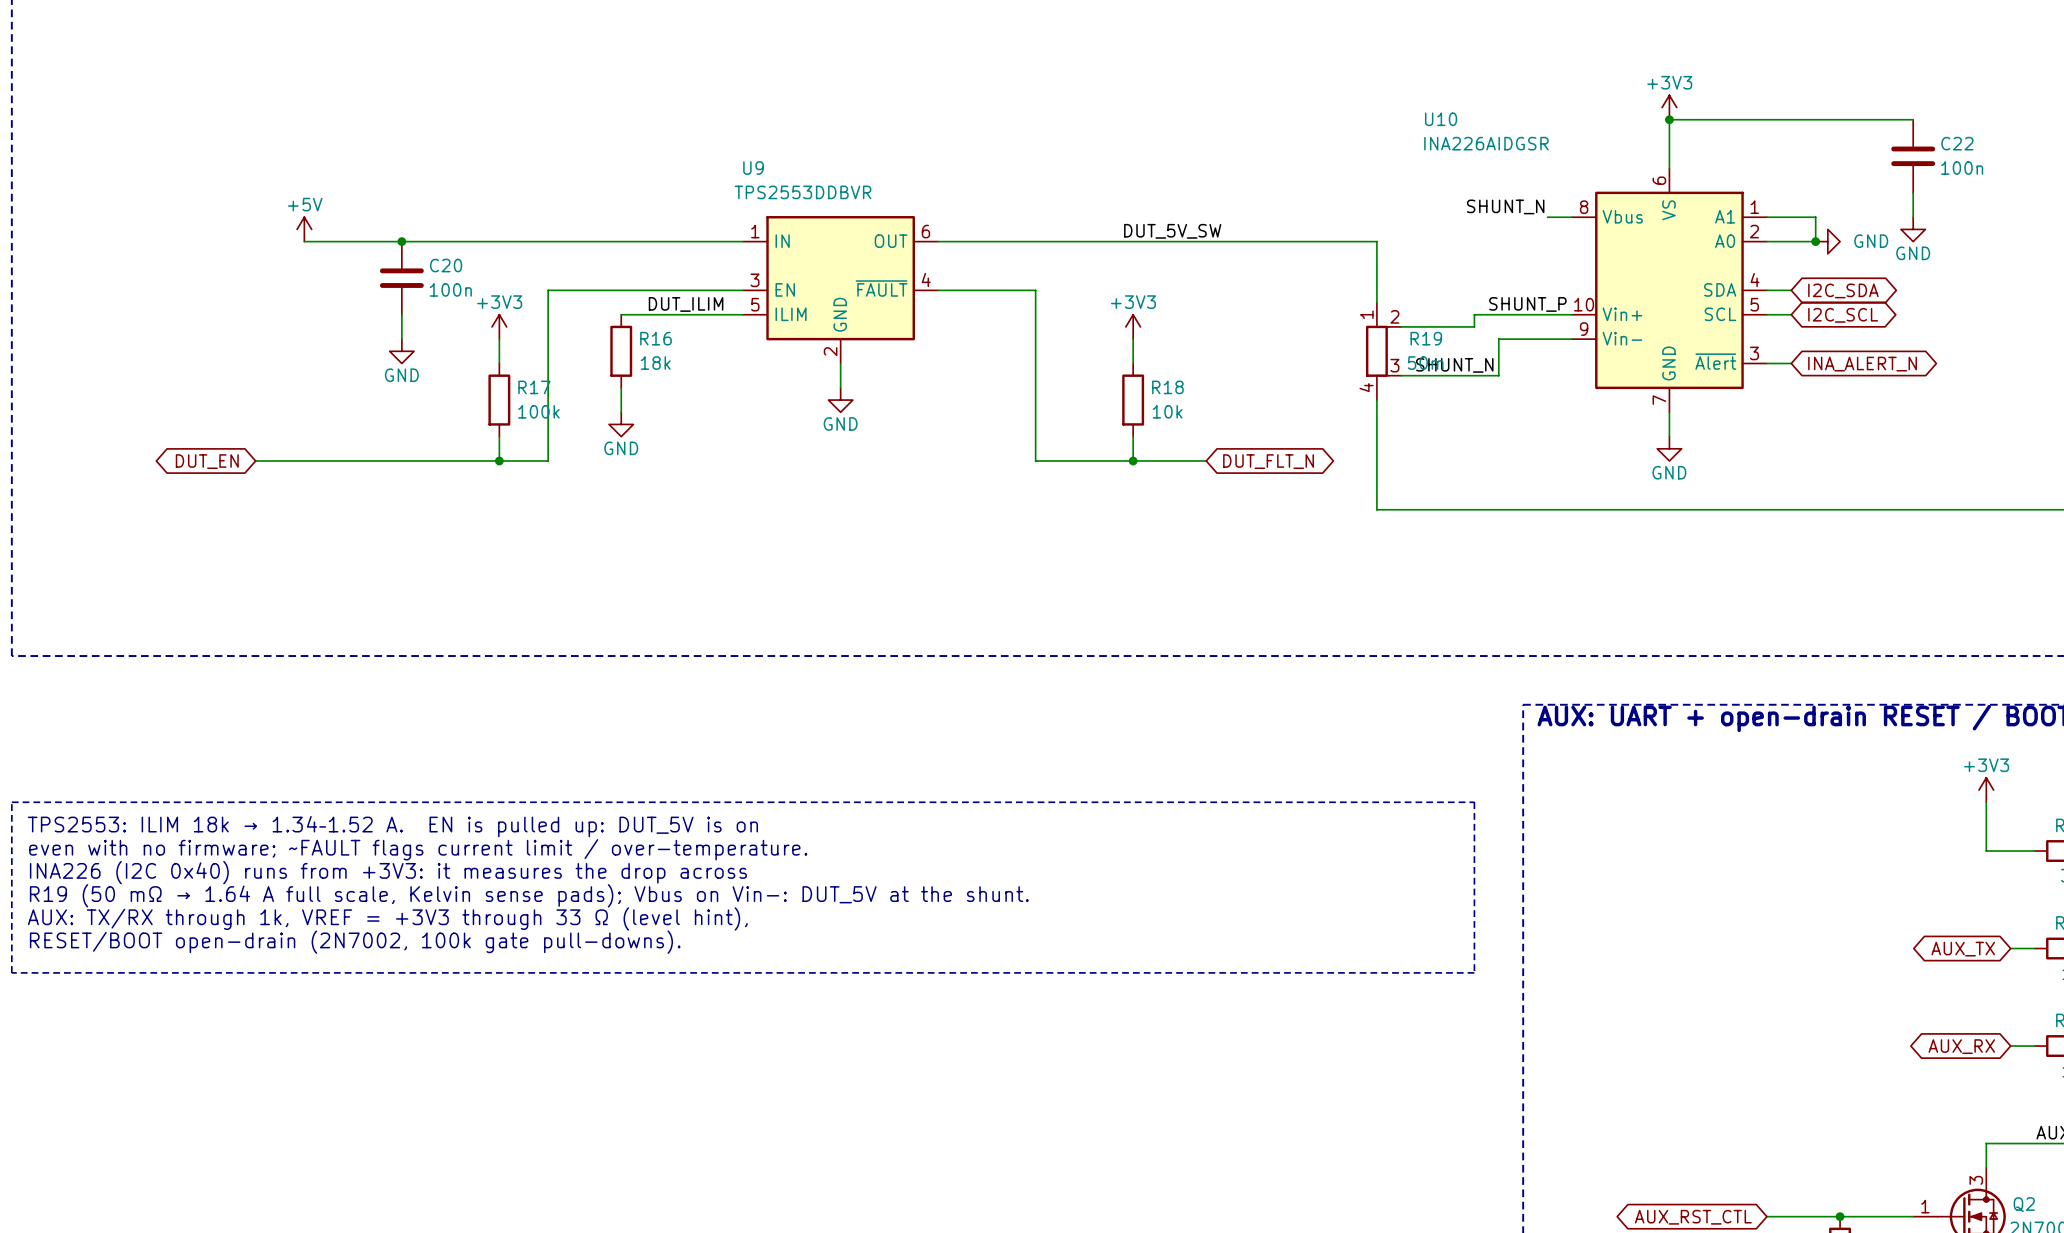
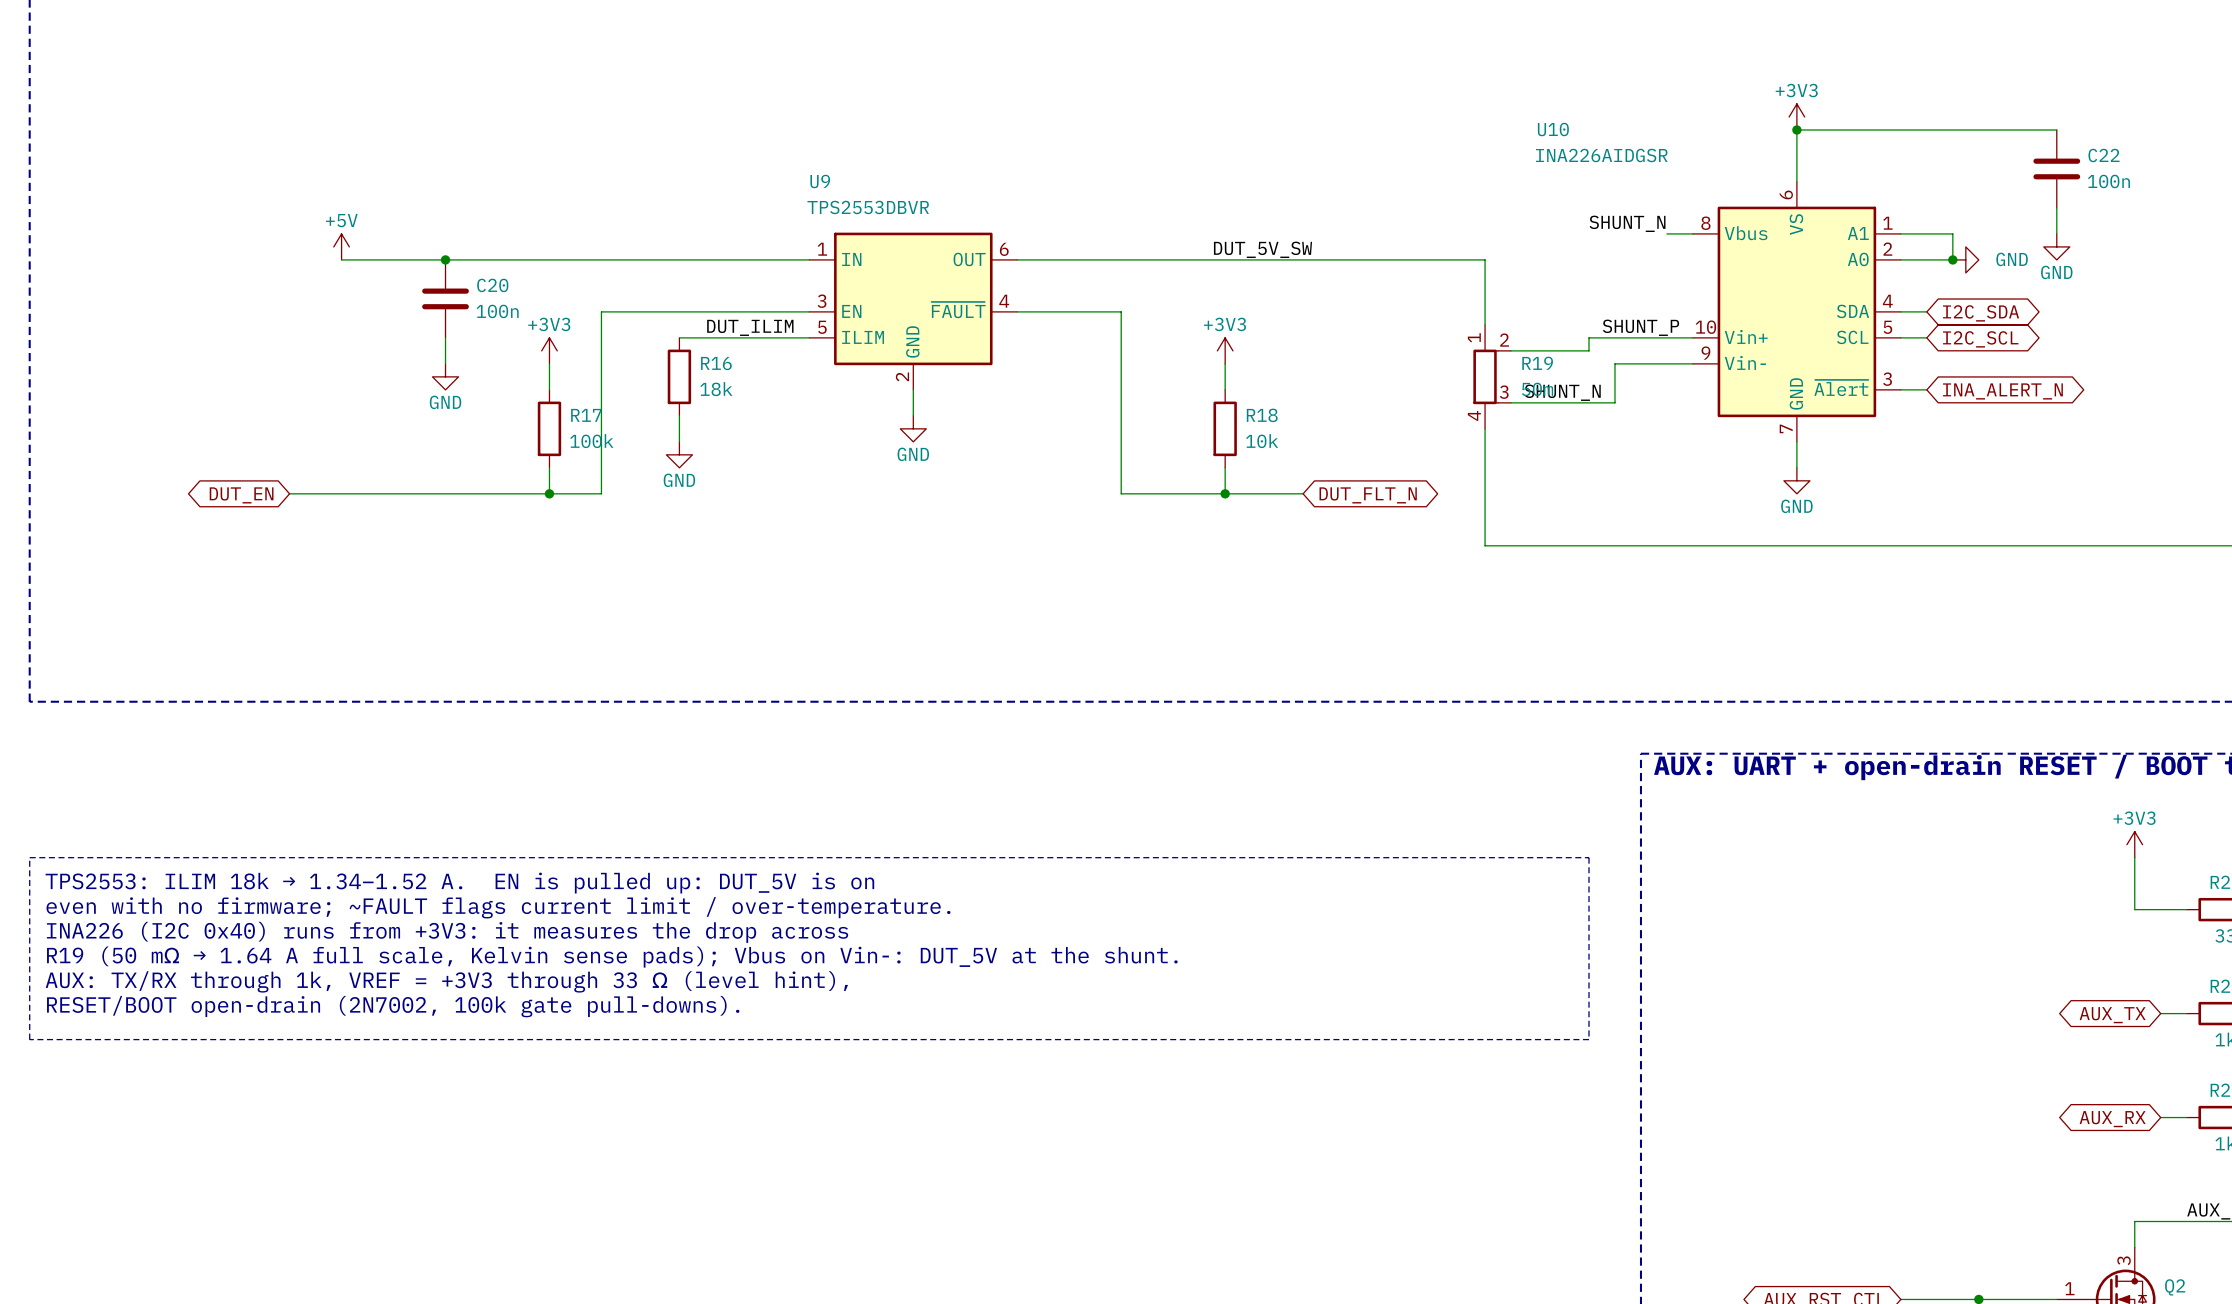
U9 value: TPS2553DDBVR (803, 192) -> TPS2553DBVR (868, 207)

